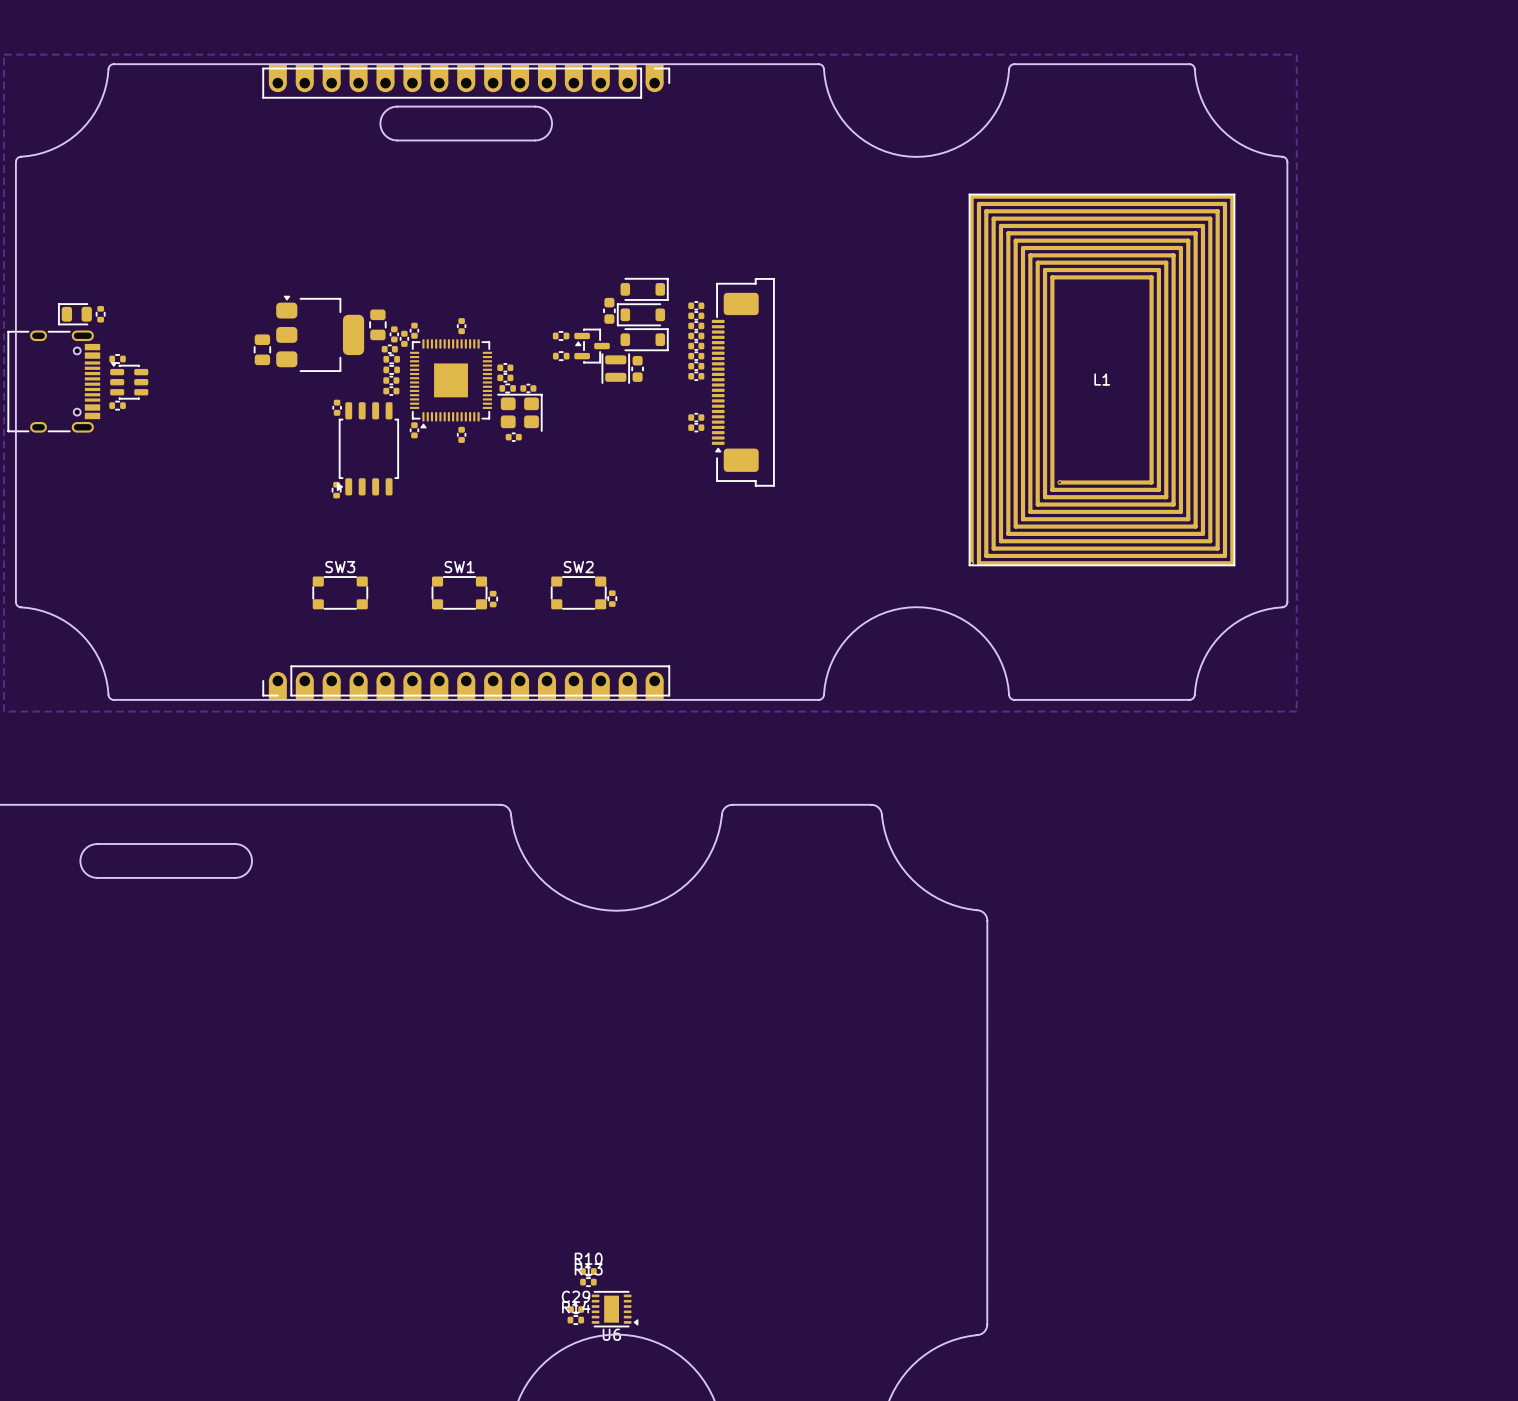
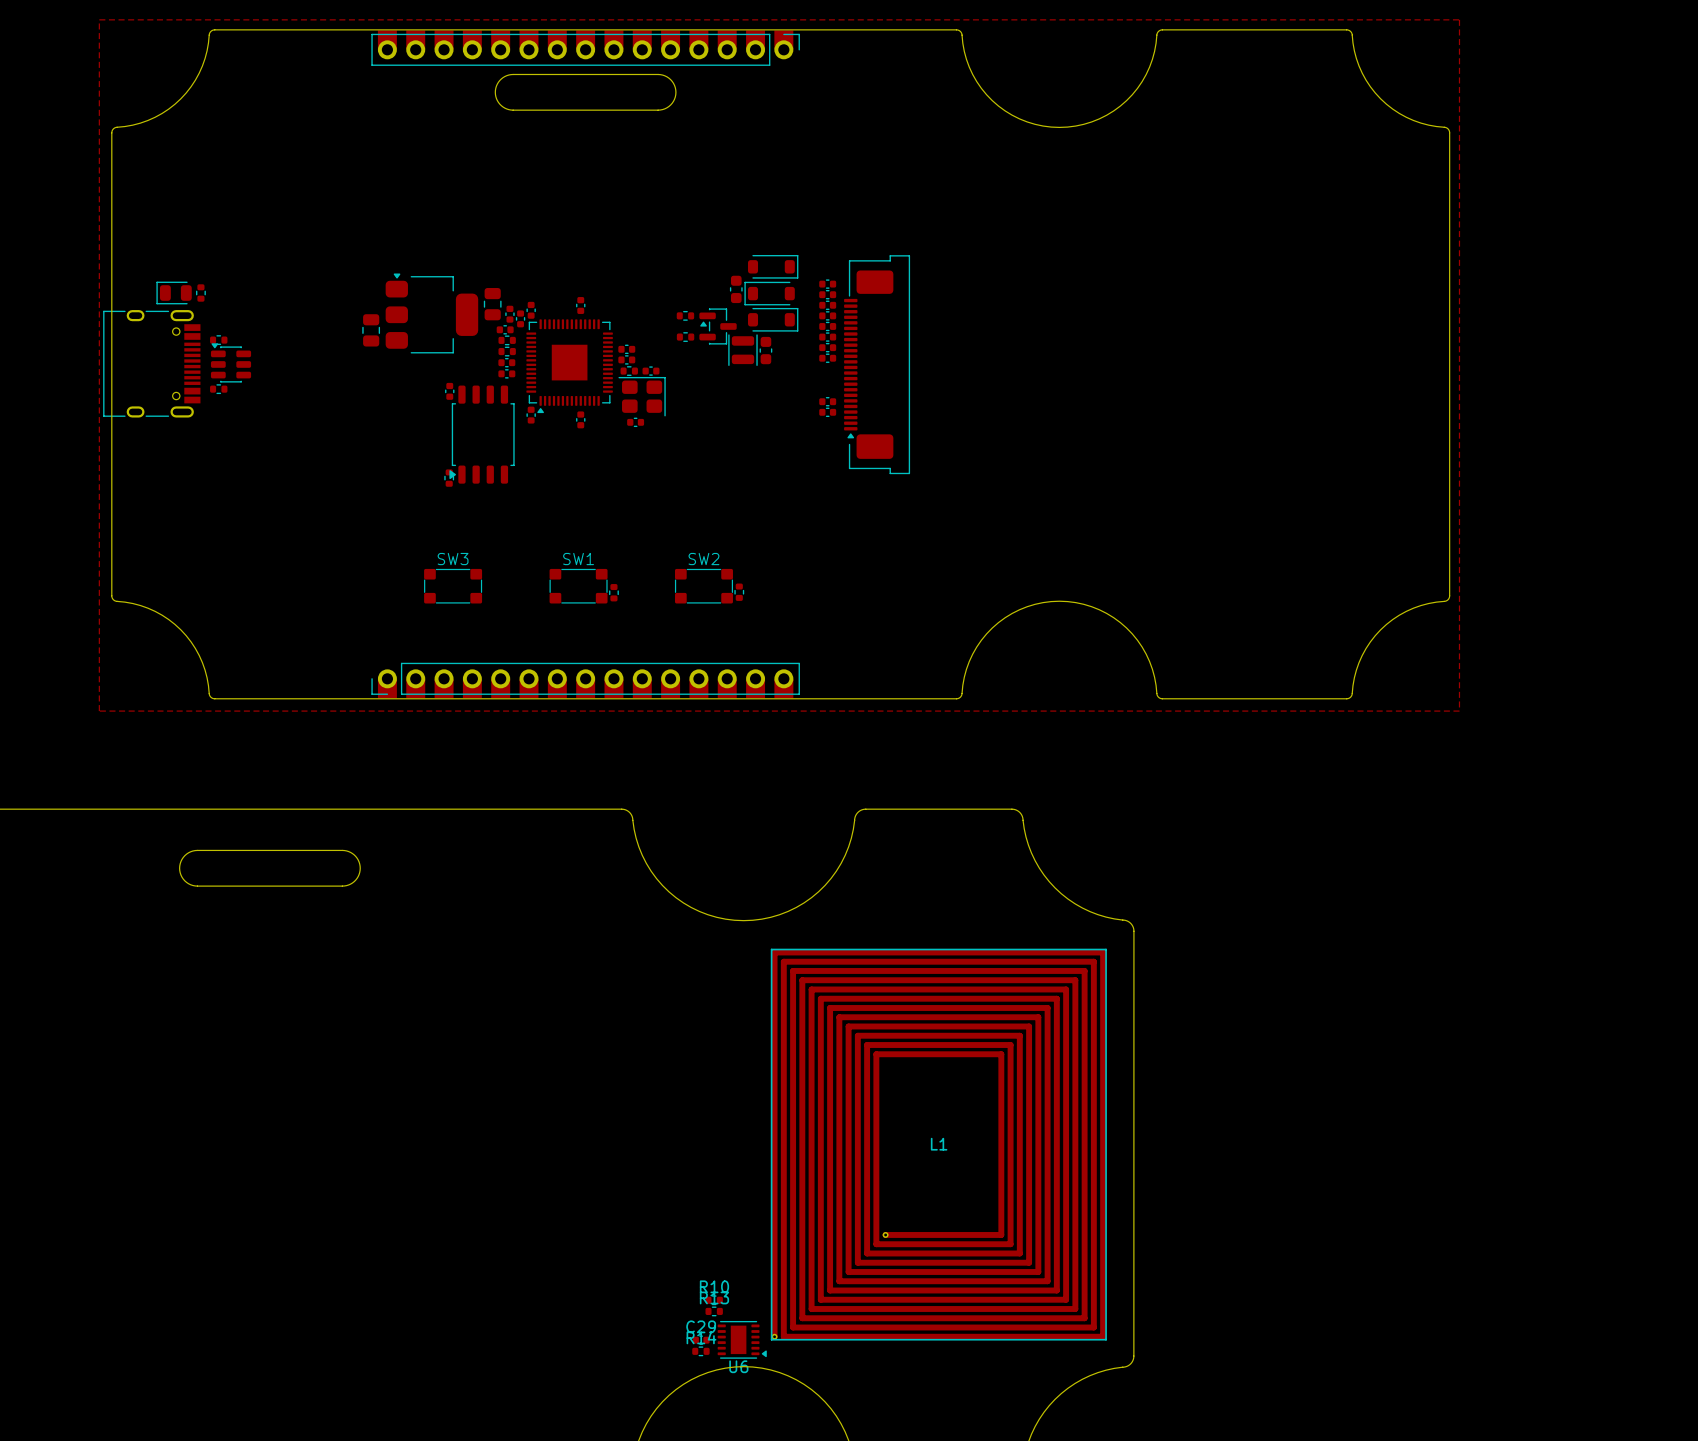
L1 footprint: [968, 193, 1236, 567] -> [770, 948, 1107, 1341]

